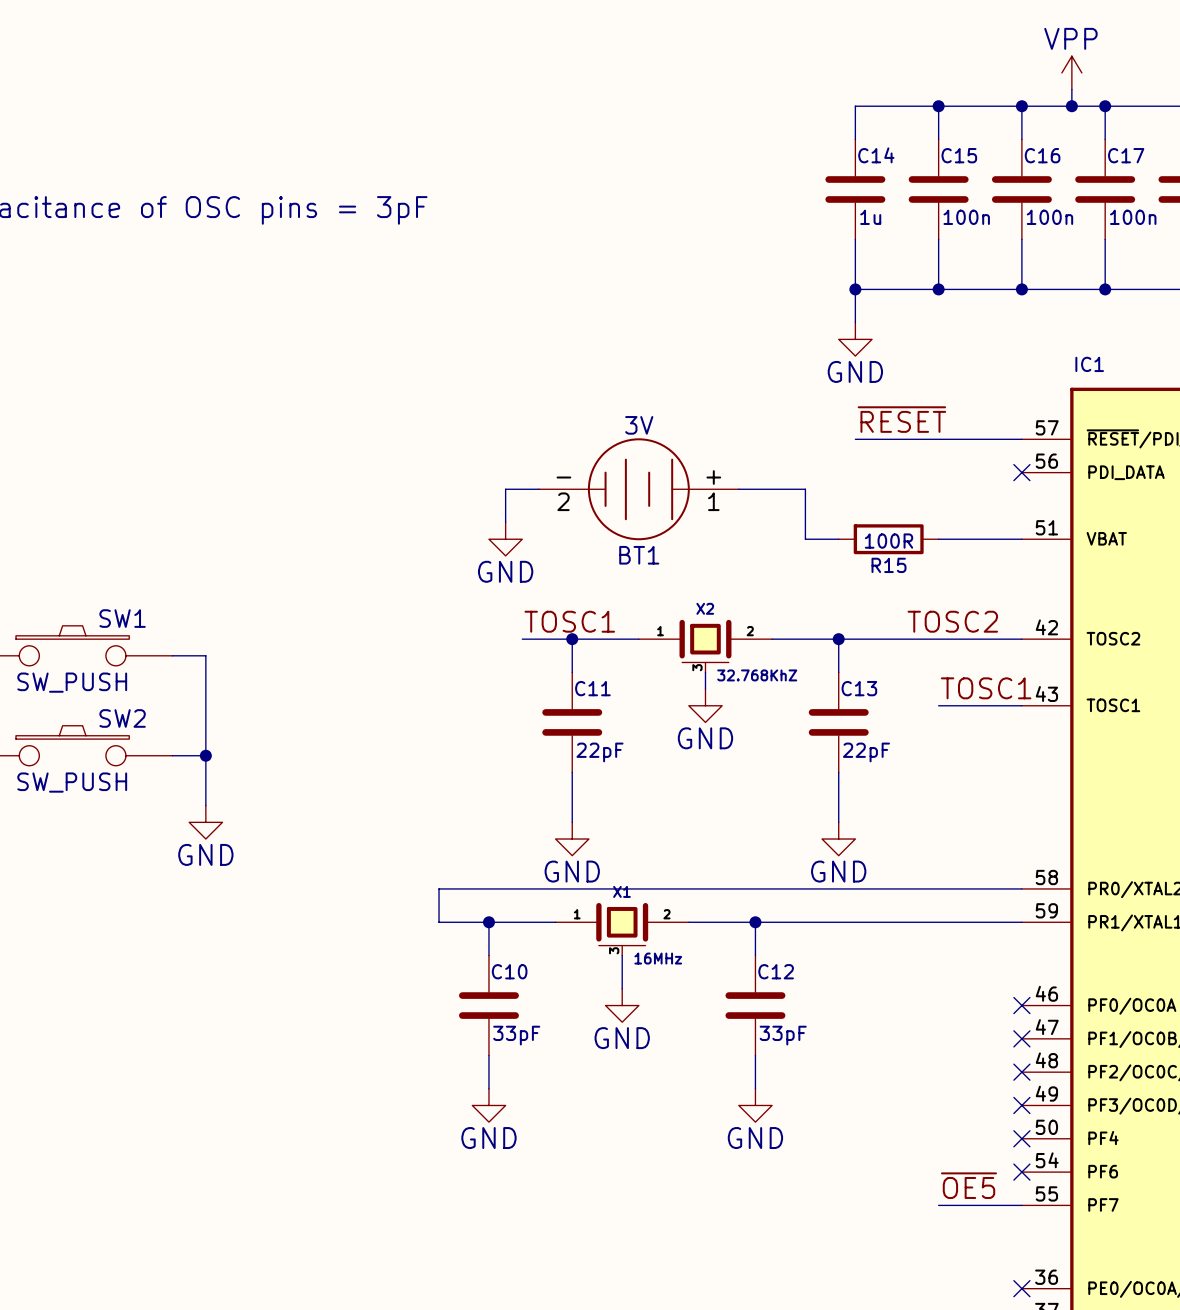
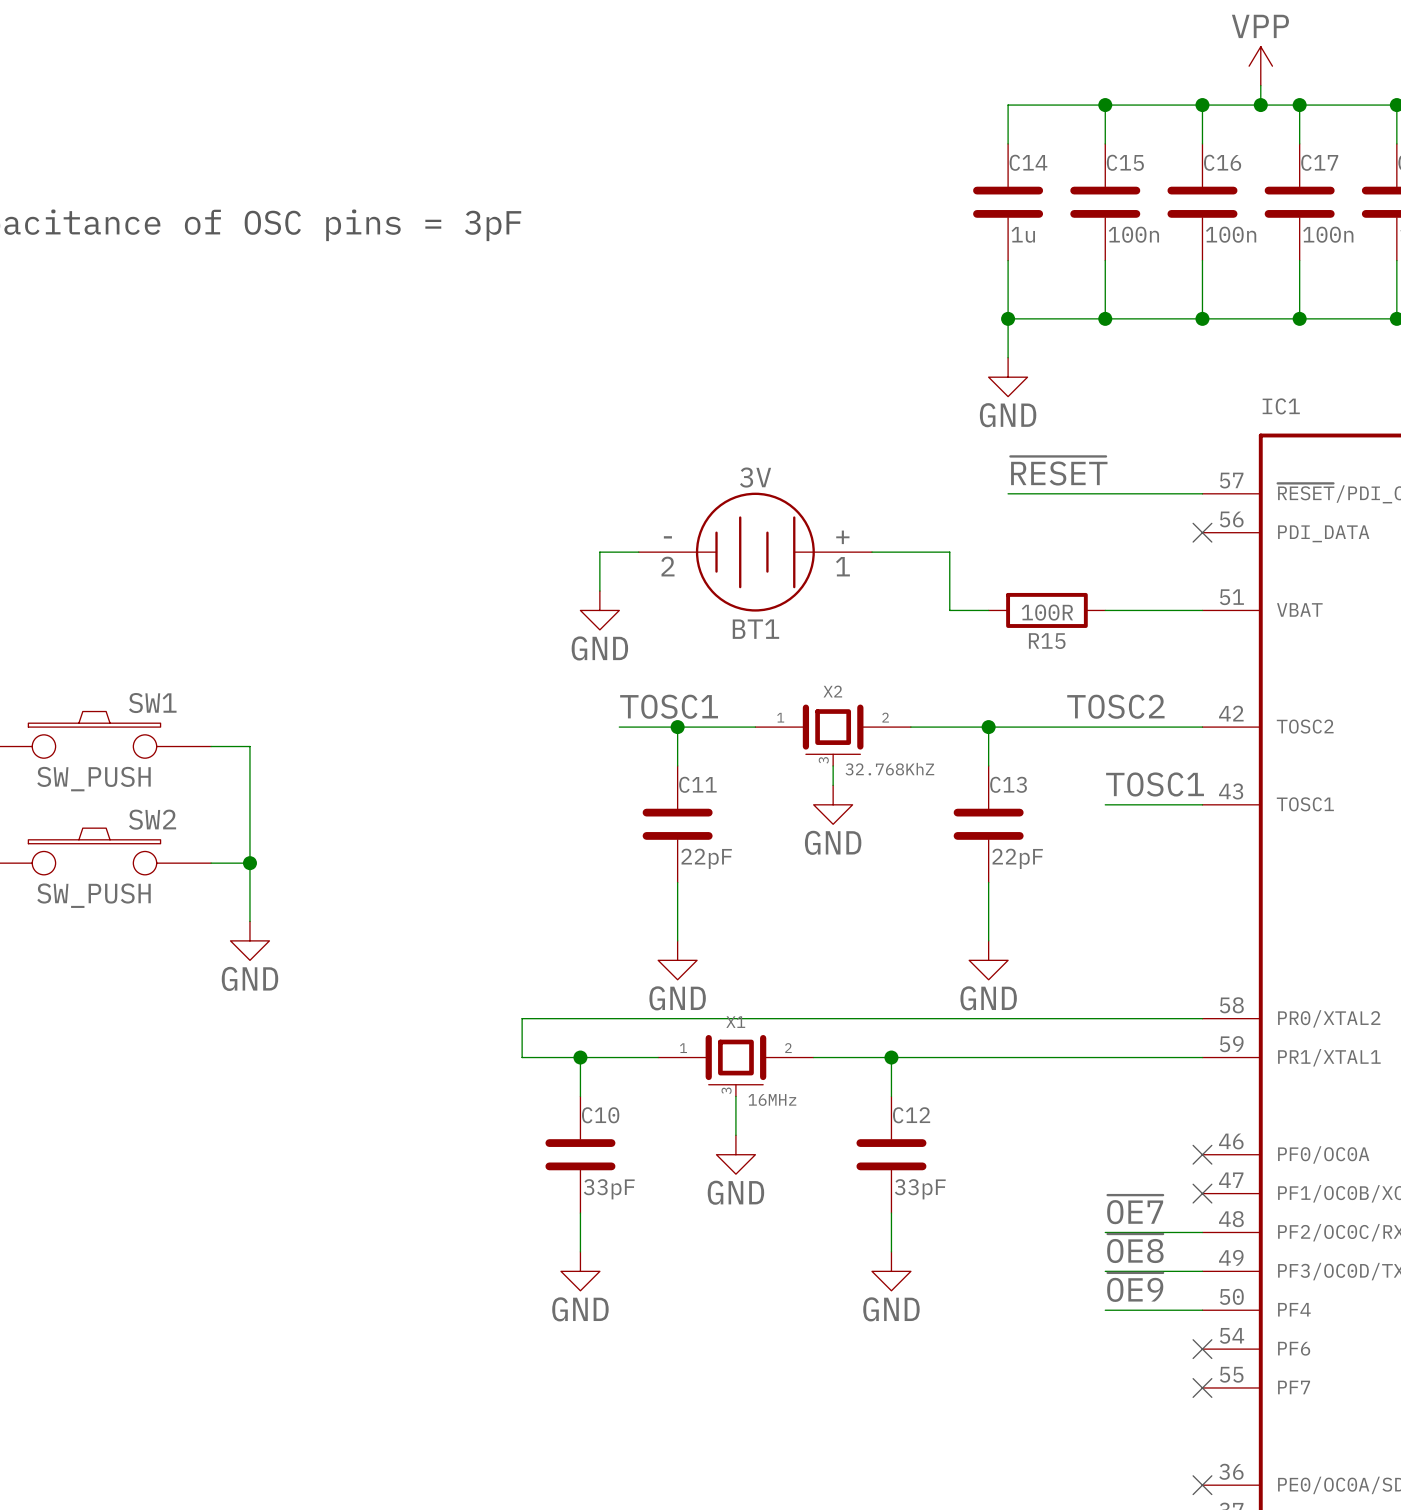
label: none -> ~{OE7} (1135, 1209)
wire: none -> (1105, 1232) (1202, 1232)
no-connect mark: (1021, 1072) -> none
label: none -> ~{OE8} (1135, 1248)
wire: none -> (1105, 1271) (1202, 1271)
no-connect mark: (1021, 1105) -> none
label: none -> ~{OE9} (1135, 1287)
no-connect mark: (1021, 1138) -> none
label: ~{OE5} (968, 1185) -> none
wire: (938, 1205) (1021, 1205) -> (1105, 1310) (1202, 1310)
no-connect mark: none -> (1202, 1387)

